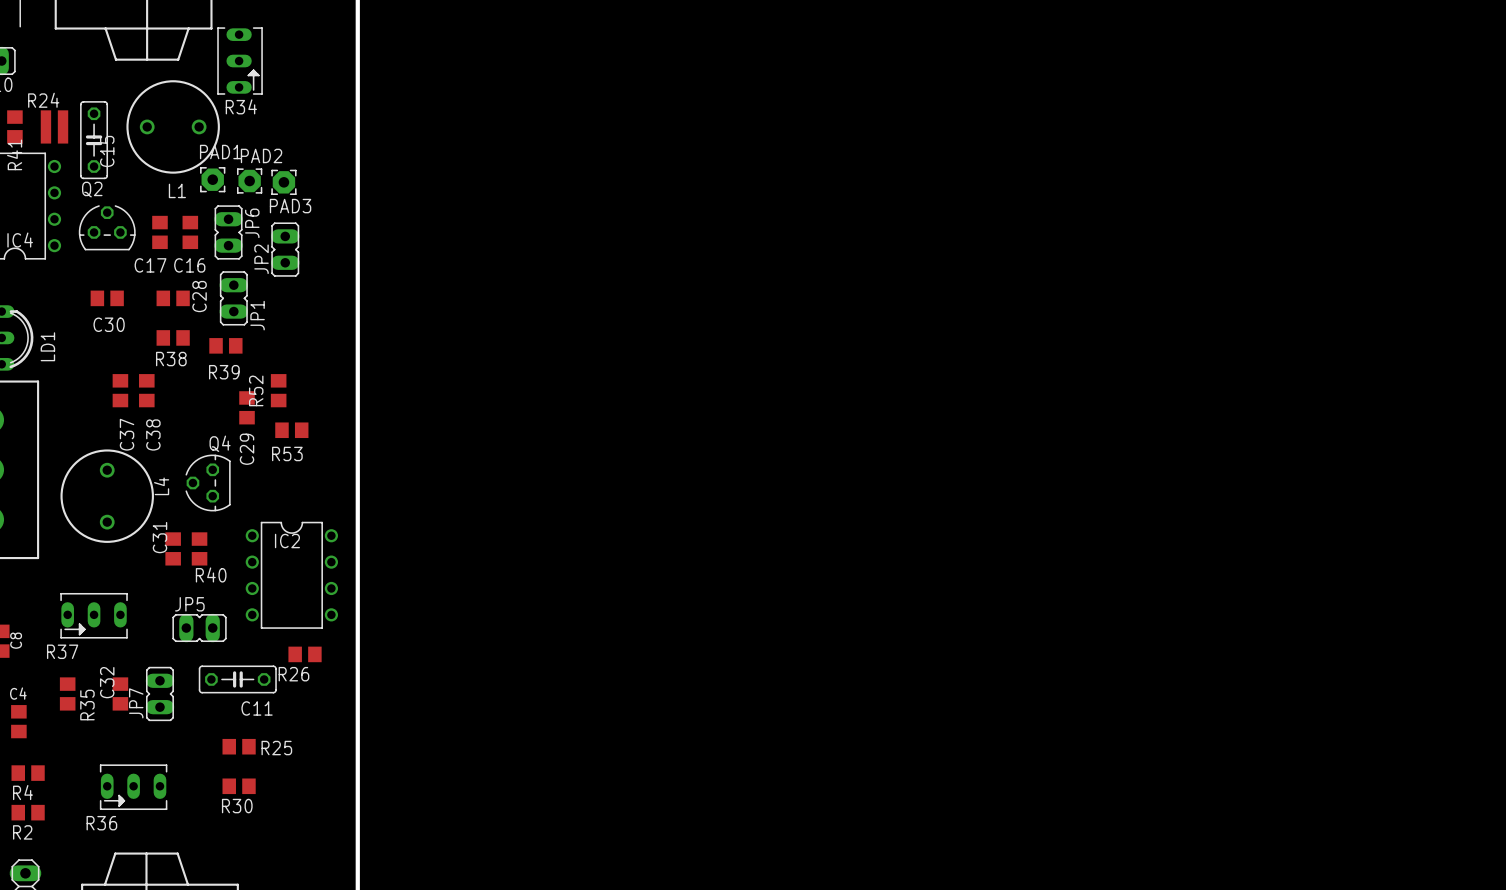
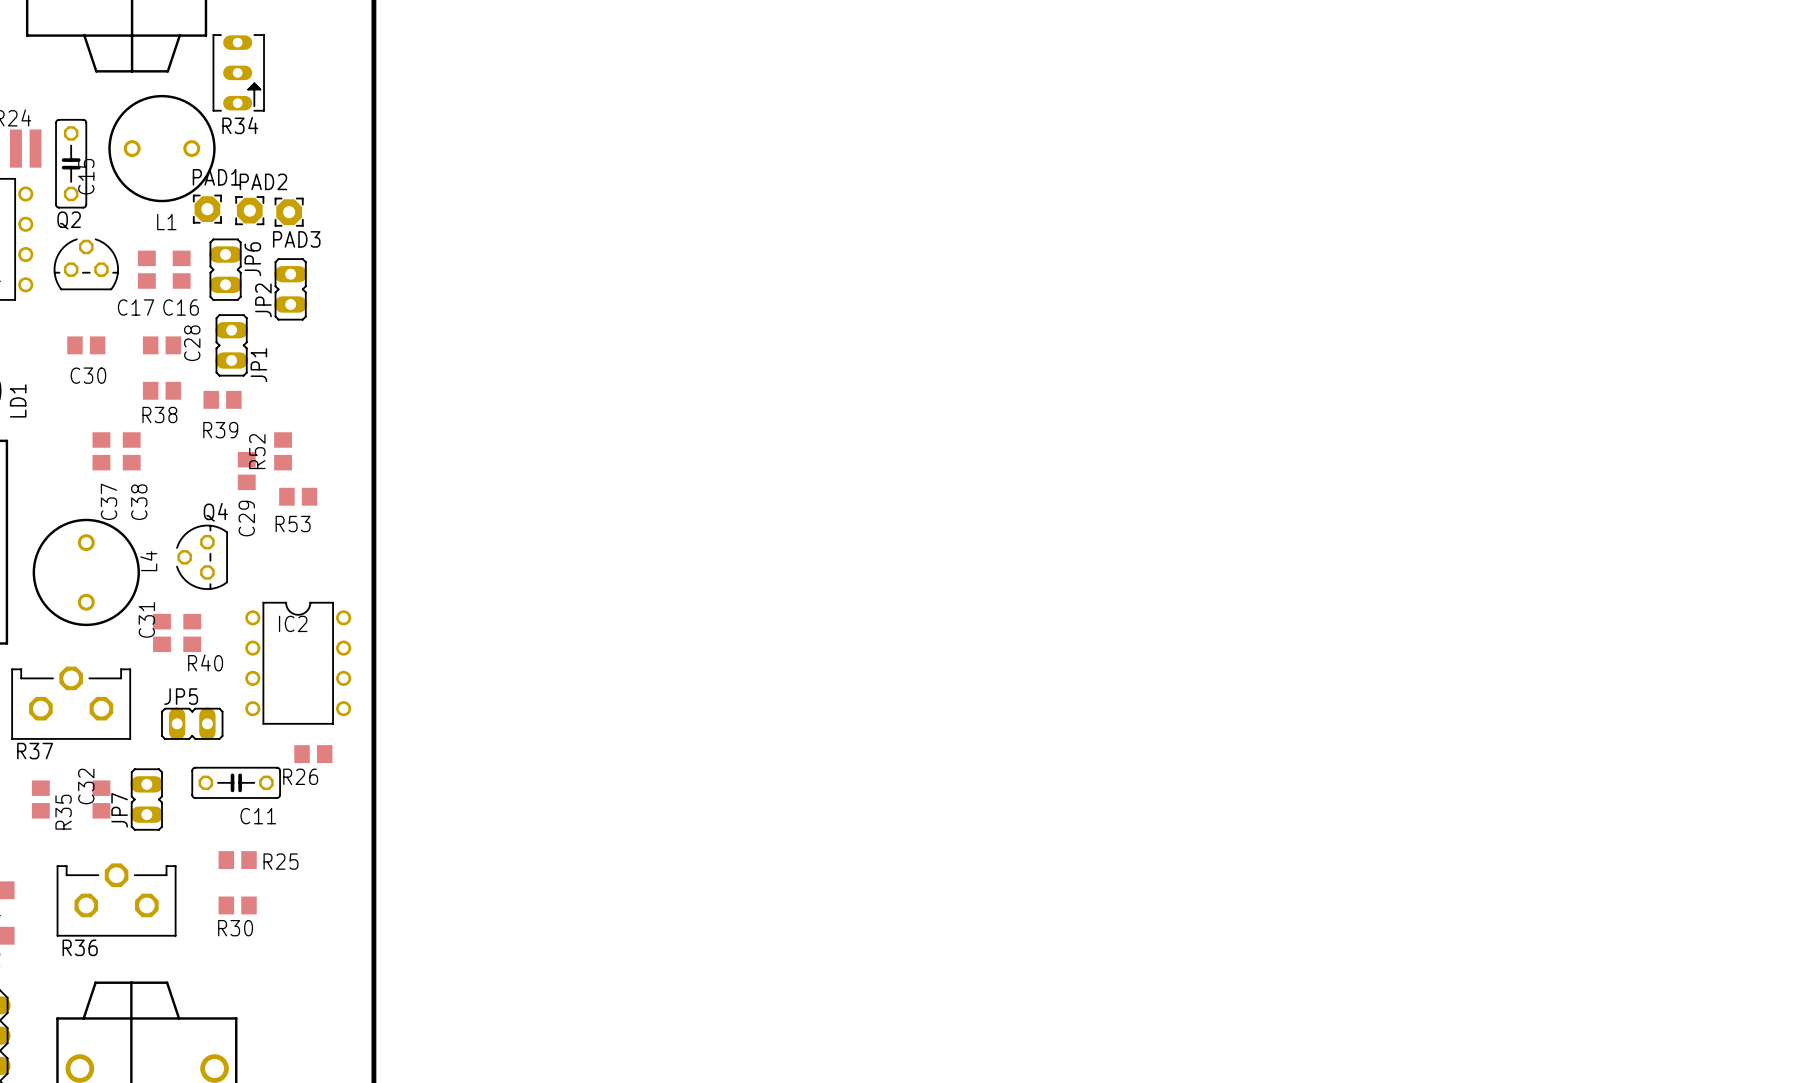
R37 footprint: [60, 592, 128, 639] -> [11, 666, 132, 740]
R36 footprint: [99, 764, 168, 811] -> [56, 863, 177, 937]

